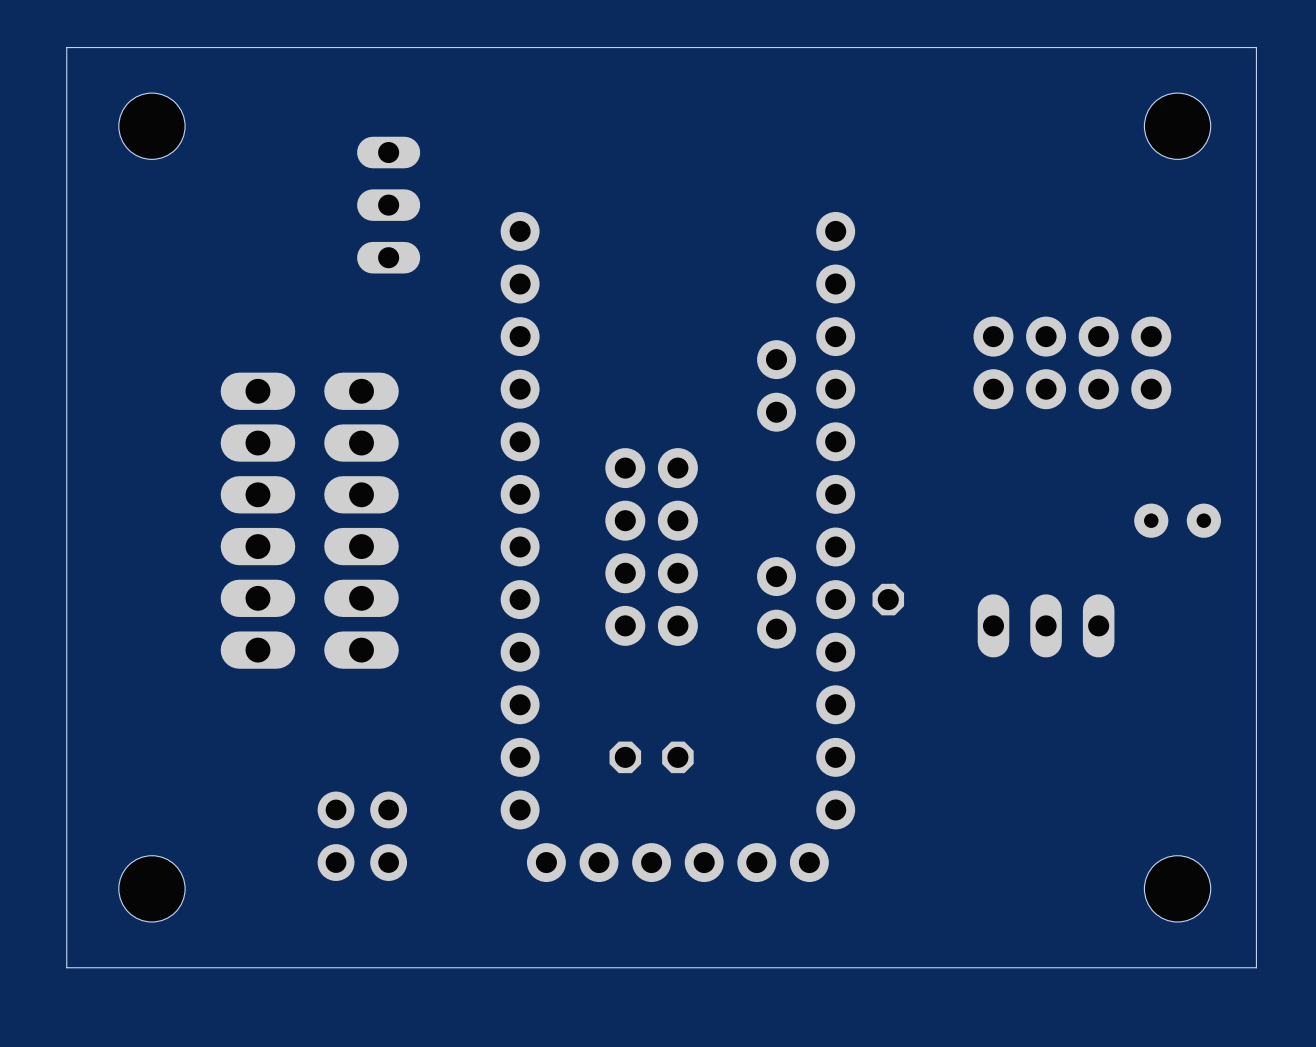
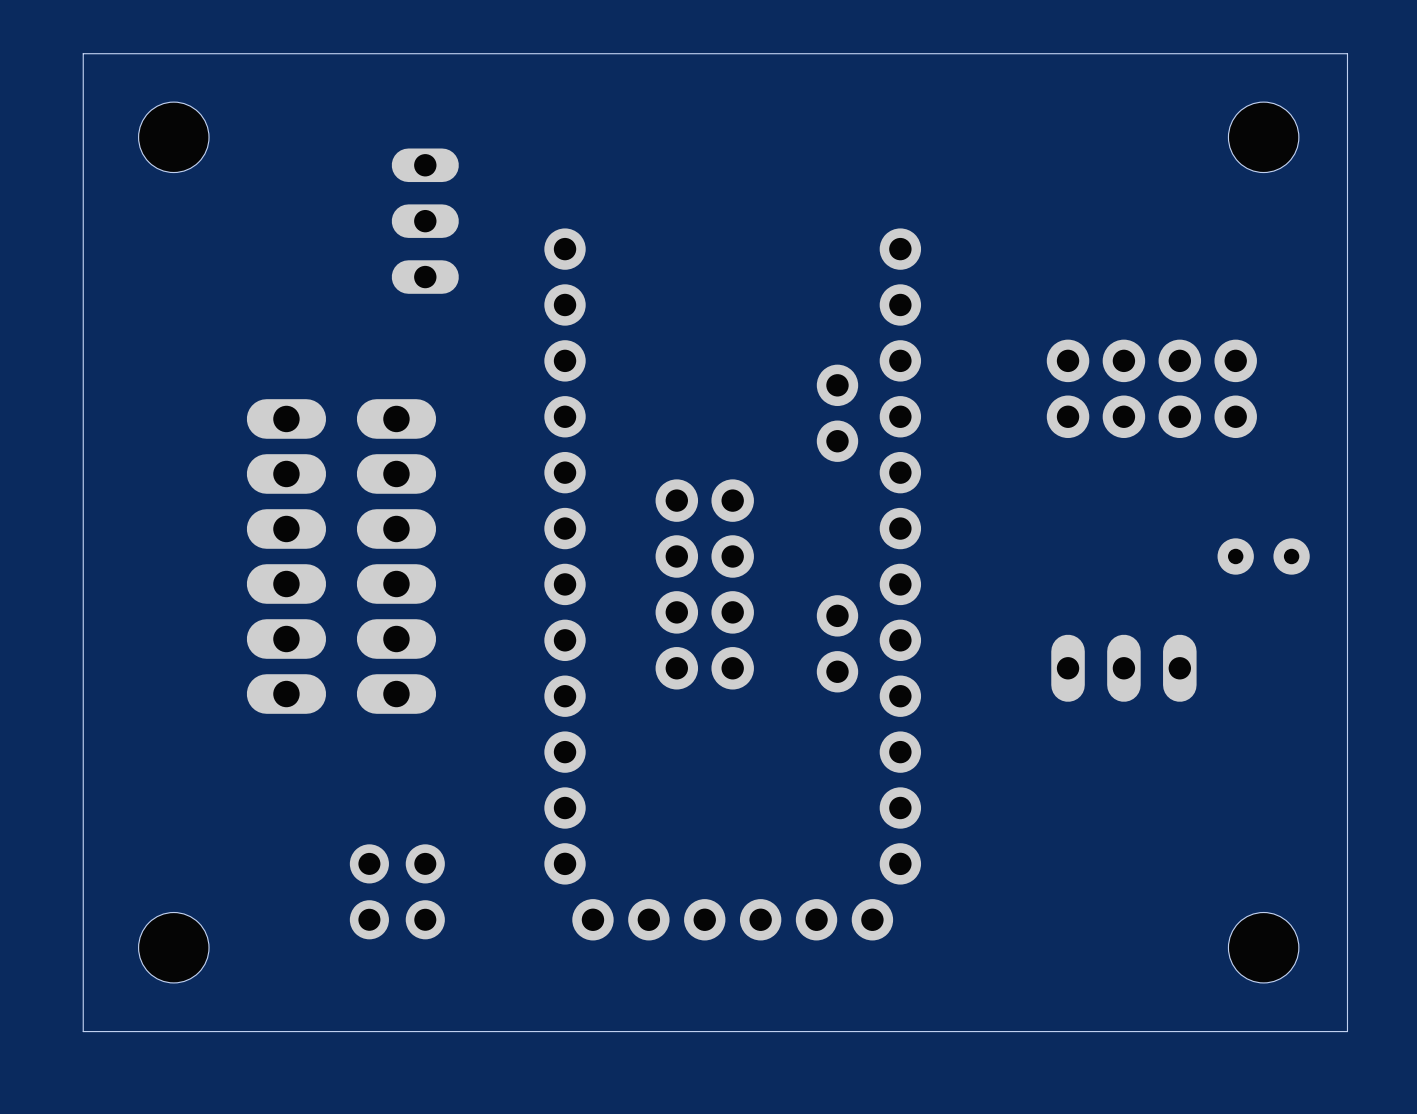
part: (888, 599) -> none
part: (625, 757) -> none
part: (677, 757) -> none

